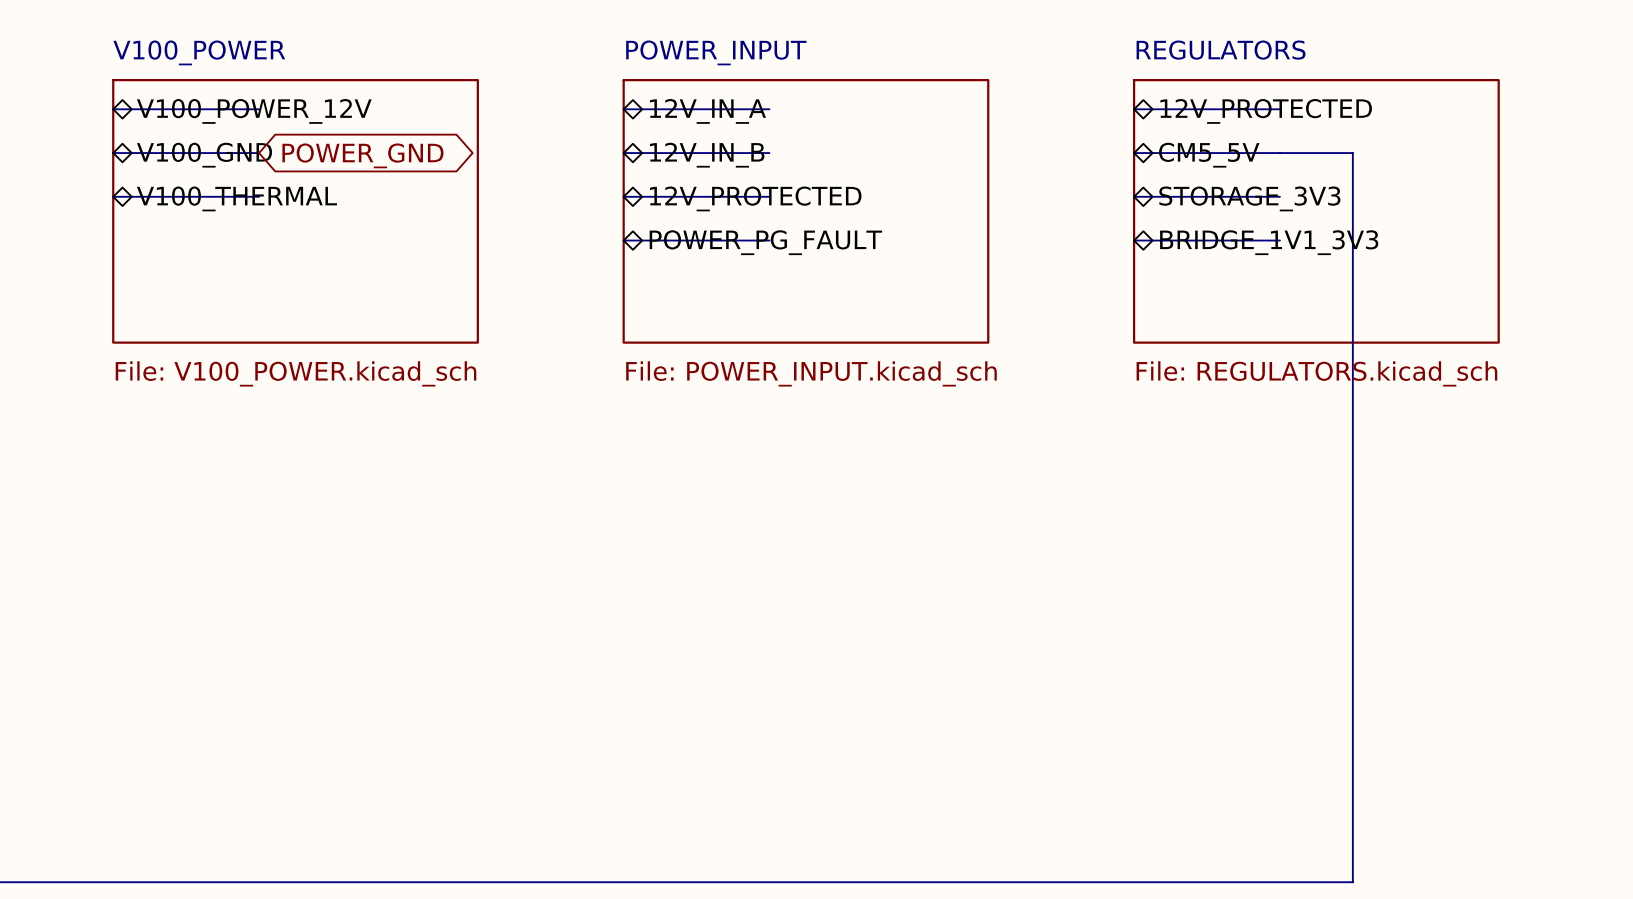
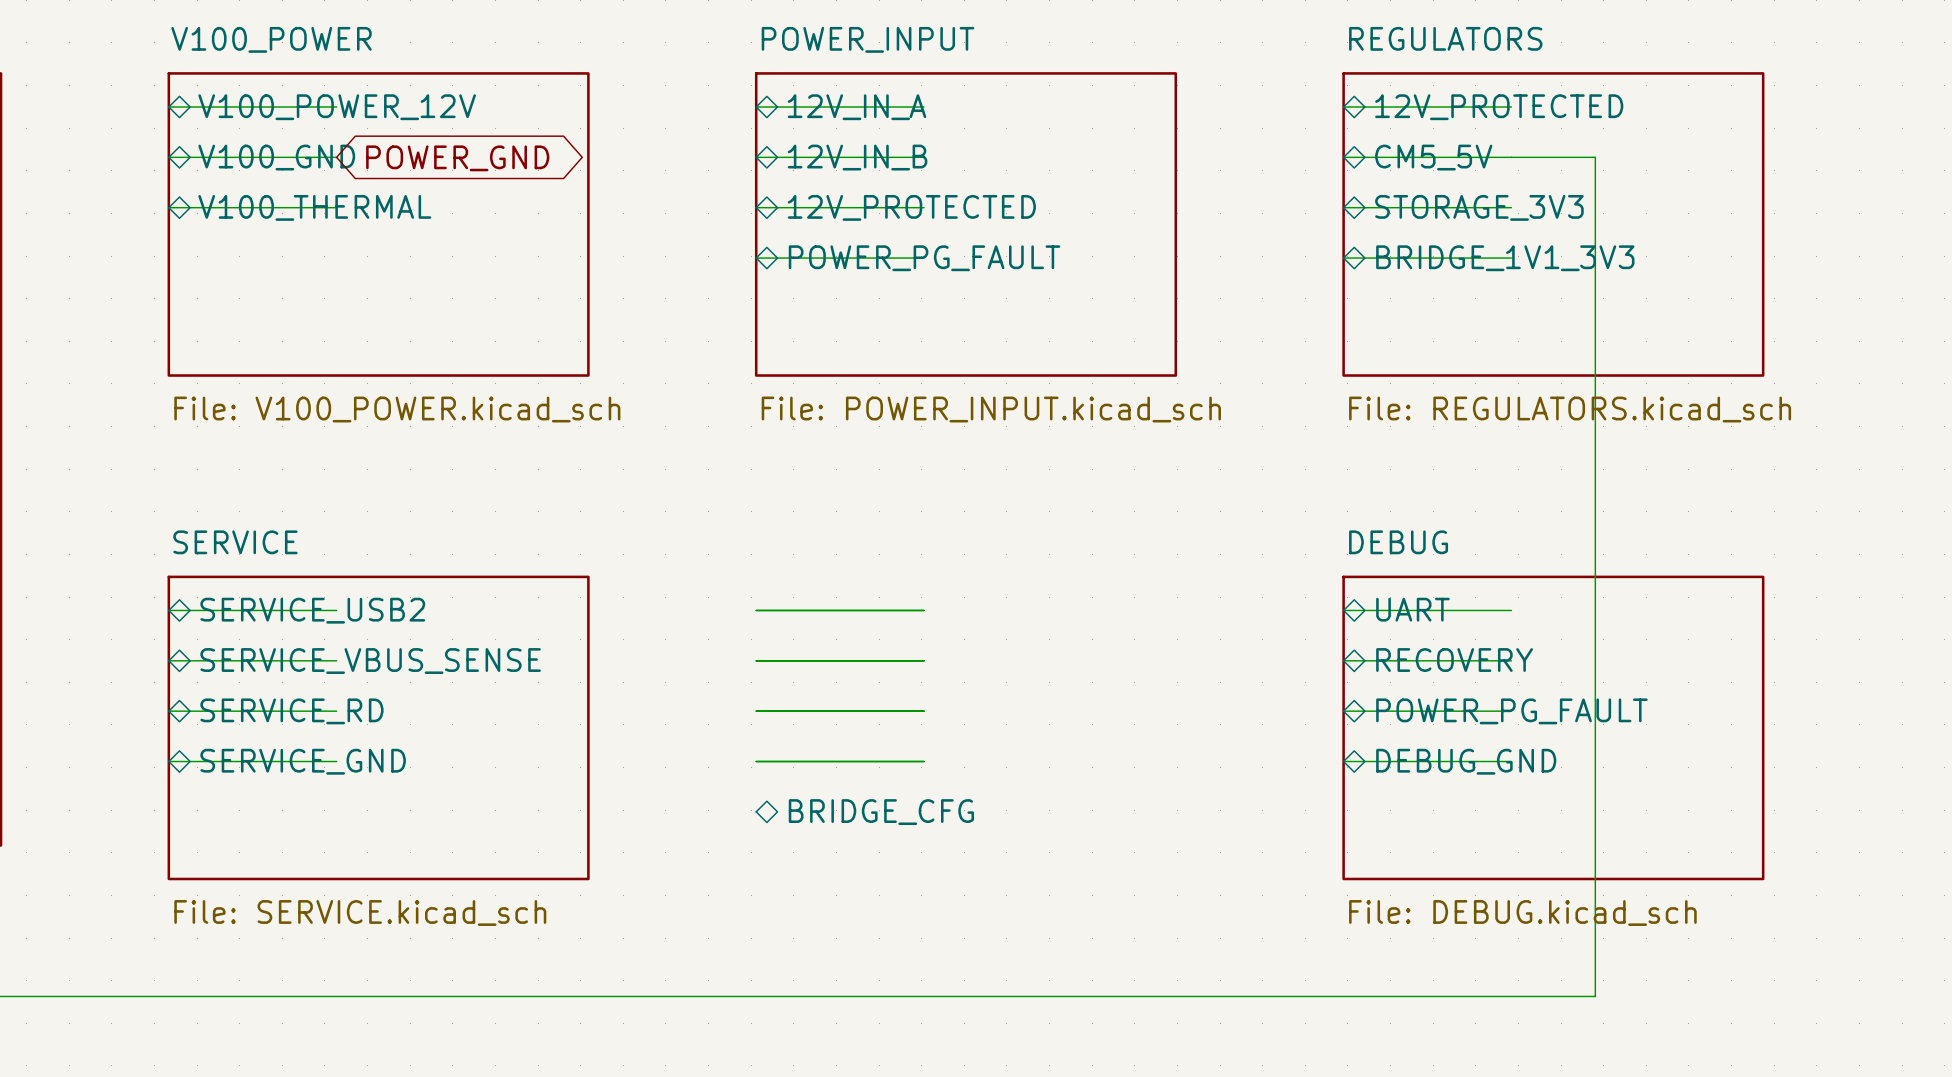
wire: none -> (168, 610) (336, 610)
wire: none -> (756, 610) (924, 610)
wire: none -> (1343, 610) (1511, 610)
sheet pin: none -> UART (1412, 609)
sheet pin: none -> SERVICE_USB2 (312, 610)
sheet pin: none -> RECOVERY (1454, 660)
wire: none -> (168, 660) (336, 660)
wire: none -> (756, 660) (924, 660)
wire: none -> (1343, 660) (1511, 660)
sheet pin: none -> SERVICE_VBUS_SENSE (370, 661)
wire: none -> (168, 711) (336, 711)
wire: none -> (756, 711) (924, 711)
wire: none -> (1343, 711) (1511, 711)
sheet pin: none -> SERVICE_RD (291, 711)
sheet pin: none -> POWER_PG_FAULT (1511, 711)
sheet SERVICE: none -> File: SERVICE.kicad_sch (378, 727)
sheet DEBUG: none -> File: DEBUG.kicad_sch (1553, 727)
wire: none -> (168, 761) (336, 761)
wire: none -> (756, 761) (924, 761)
wire: none -> (1343, 761) (1511, 761)
sheet pin: none -> SERVICE_GND (303, 761)
sheet pin: none -> DEBUG_GND (1466, 761)
sheet pin: none -> BRIDGE_CFG (881, 812)

